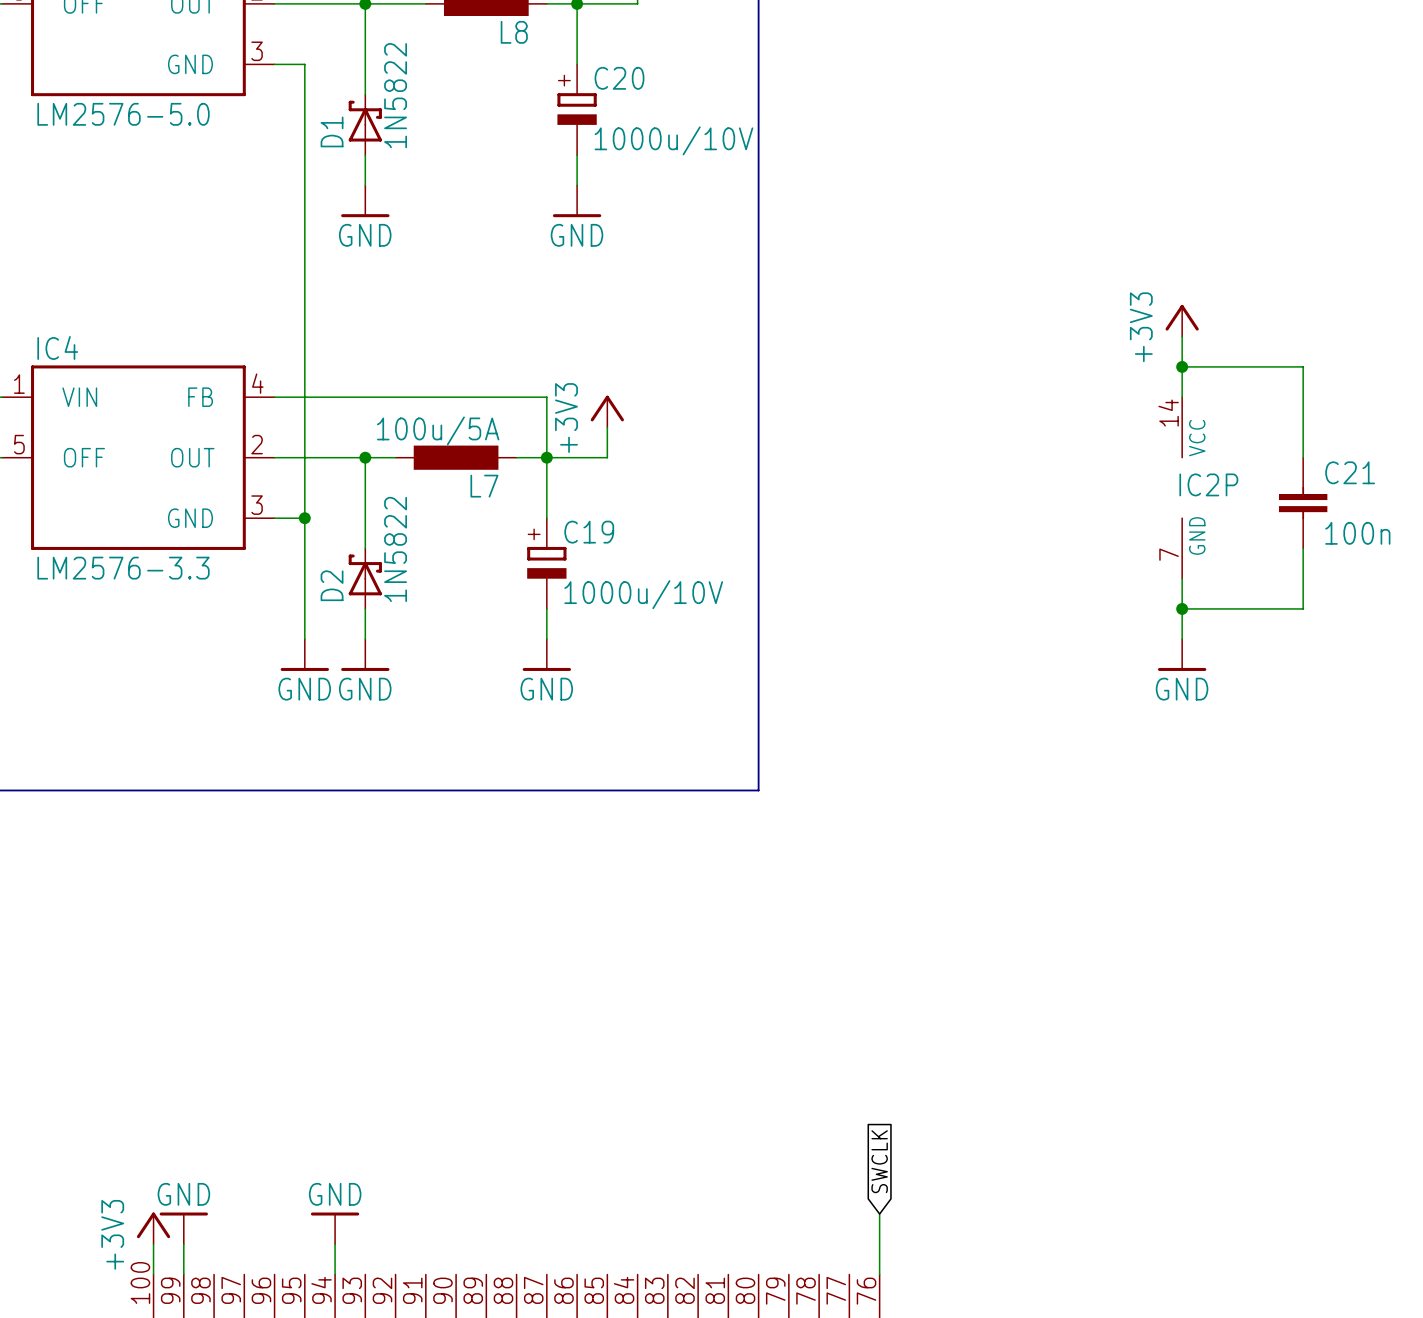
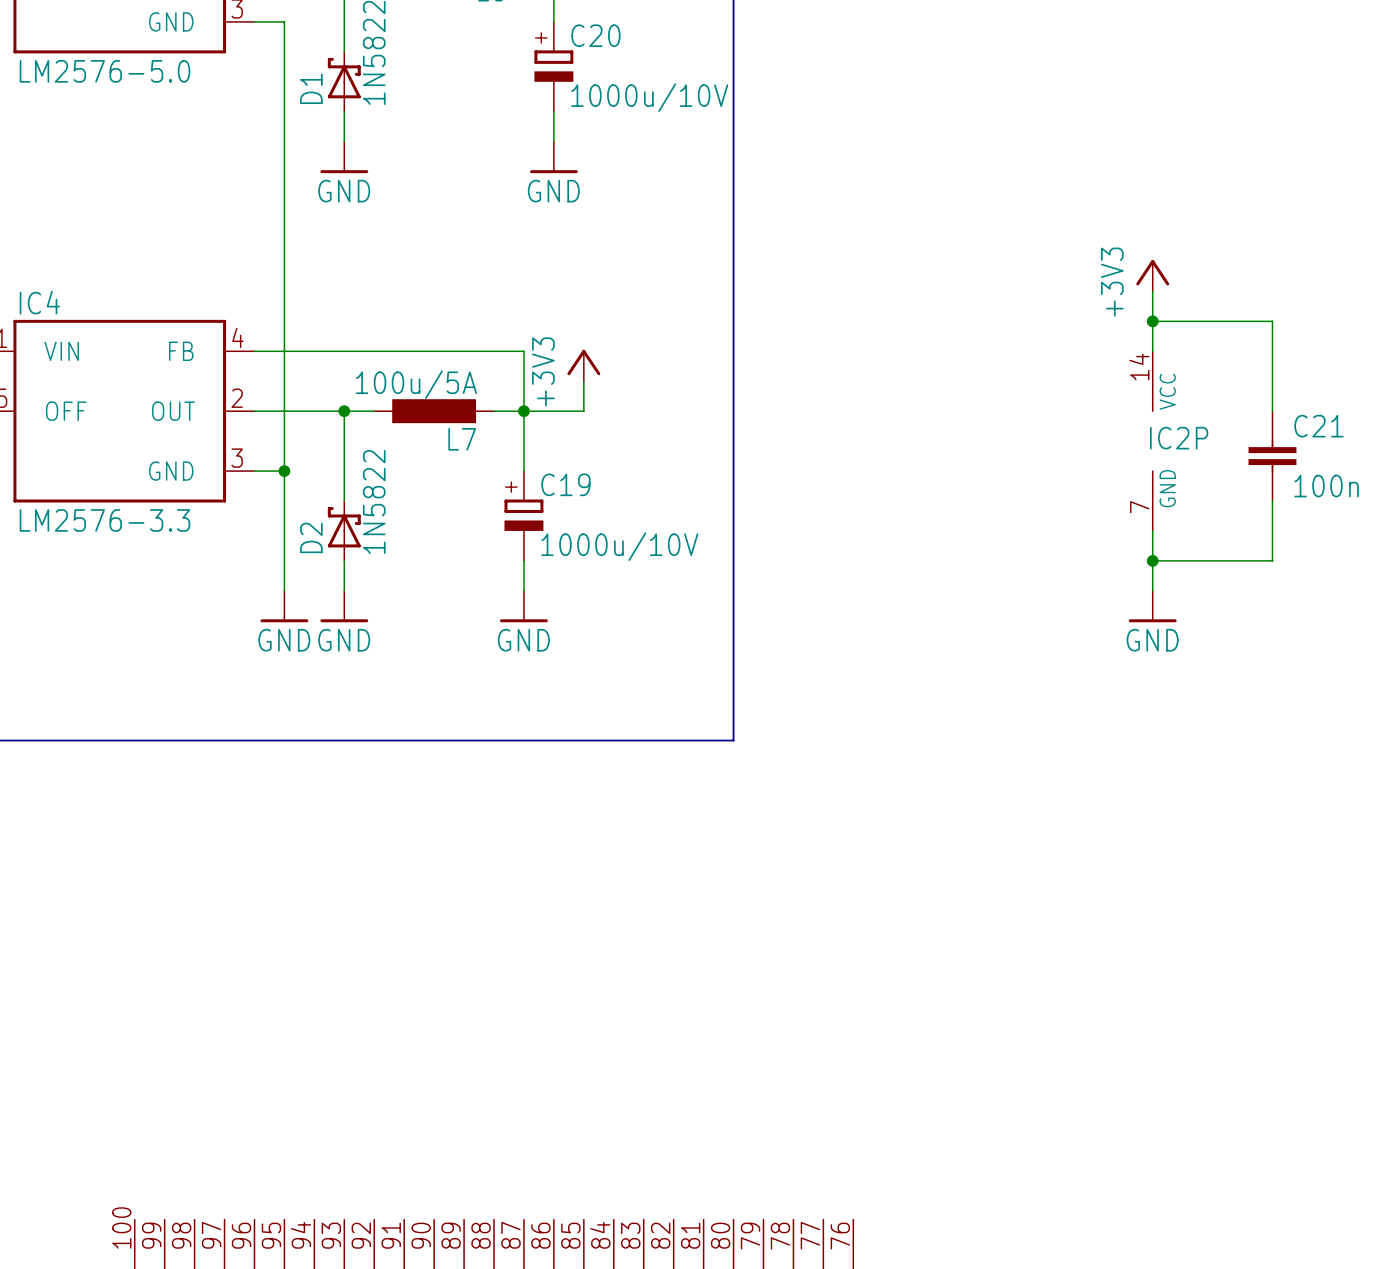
global label: SWCLK (879, 1161) -> none
wire: (879, 1214) (879, 1274) -> none
power symbol: +3V3 (153, 1228) -> none
power symbol: GND (183, 1228) -> none
power symbol: GND (335, 1228) -> none
wire: (153, 1244) (153, 1274) -> none
wire: (183, 1244) (183, 1274) -> none
wire: (335, 1244) (335, 1274) -> none

